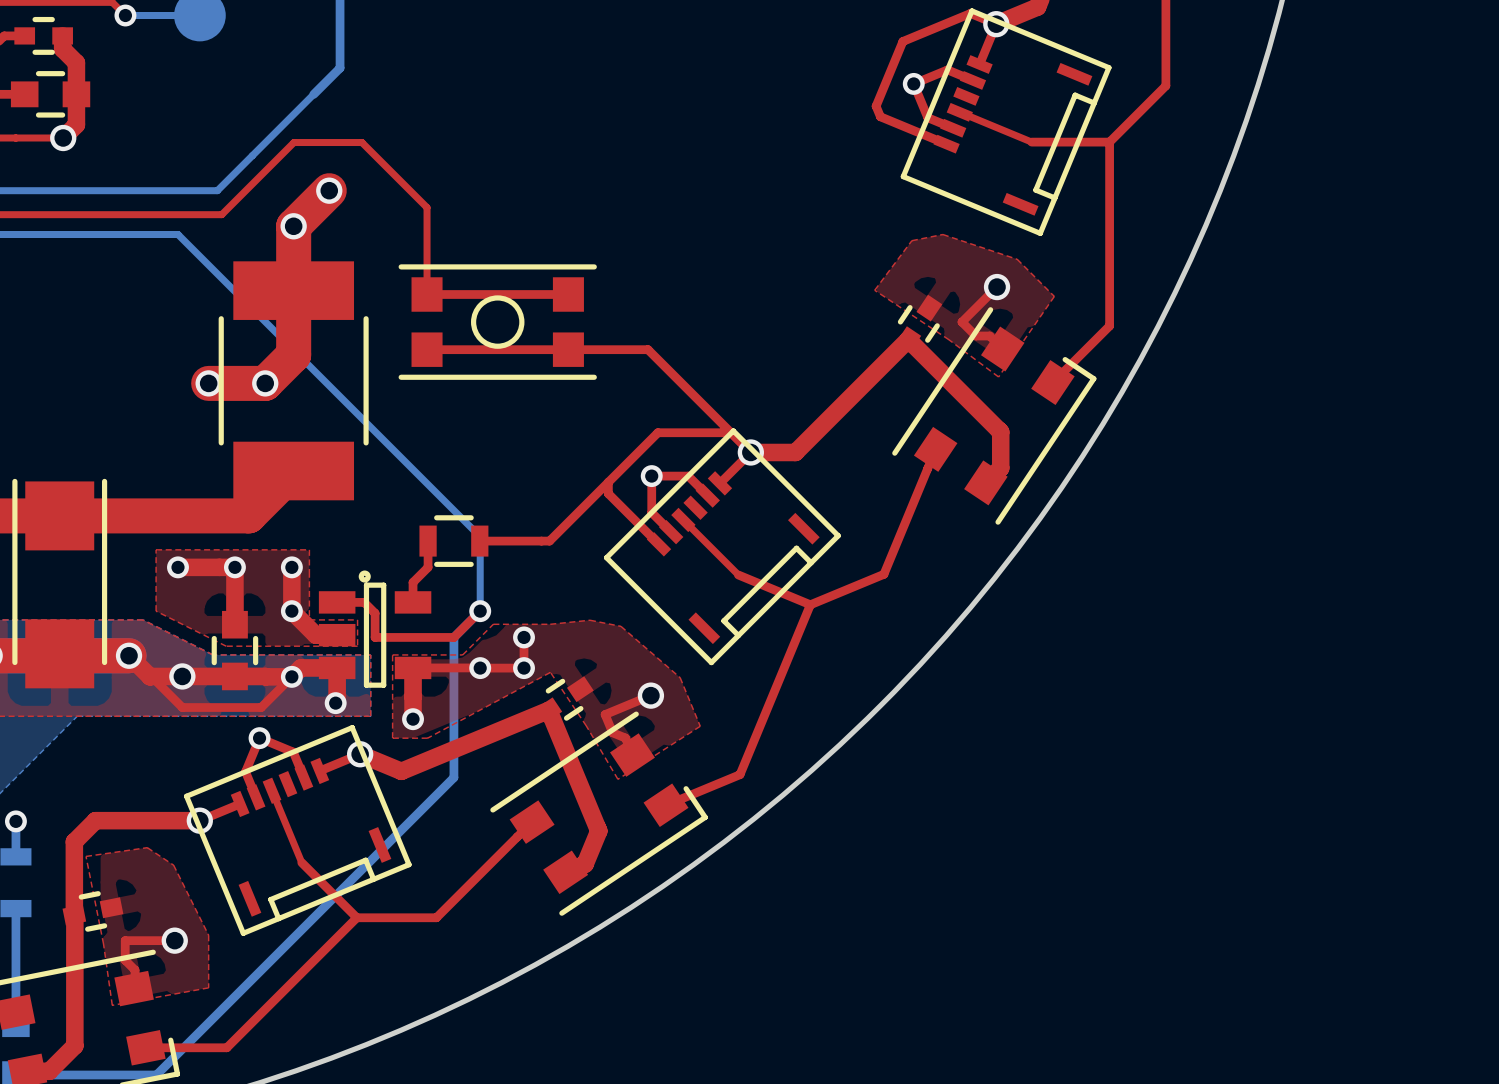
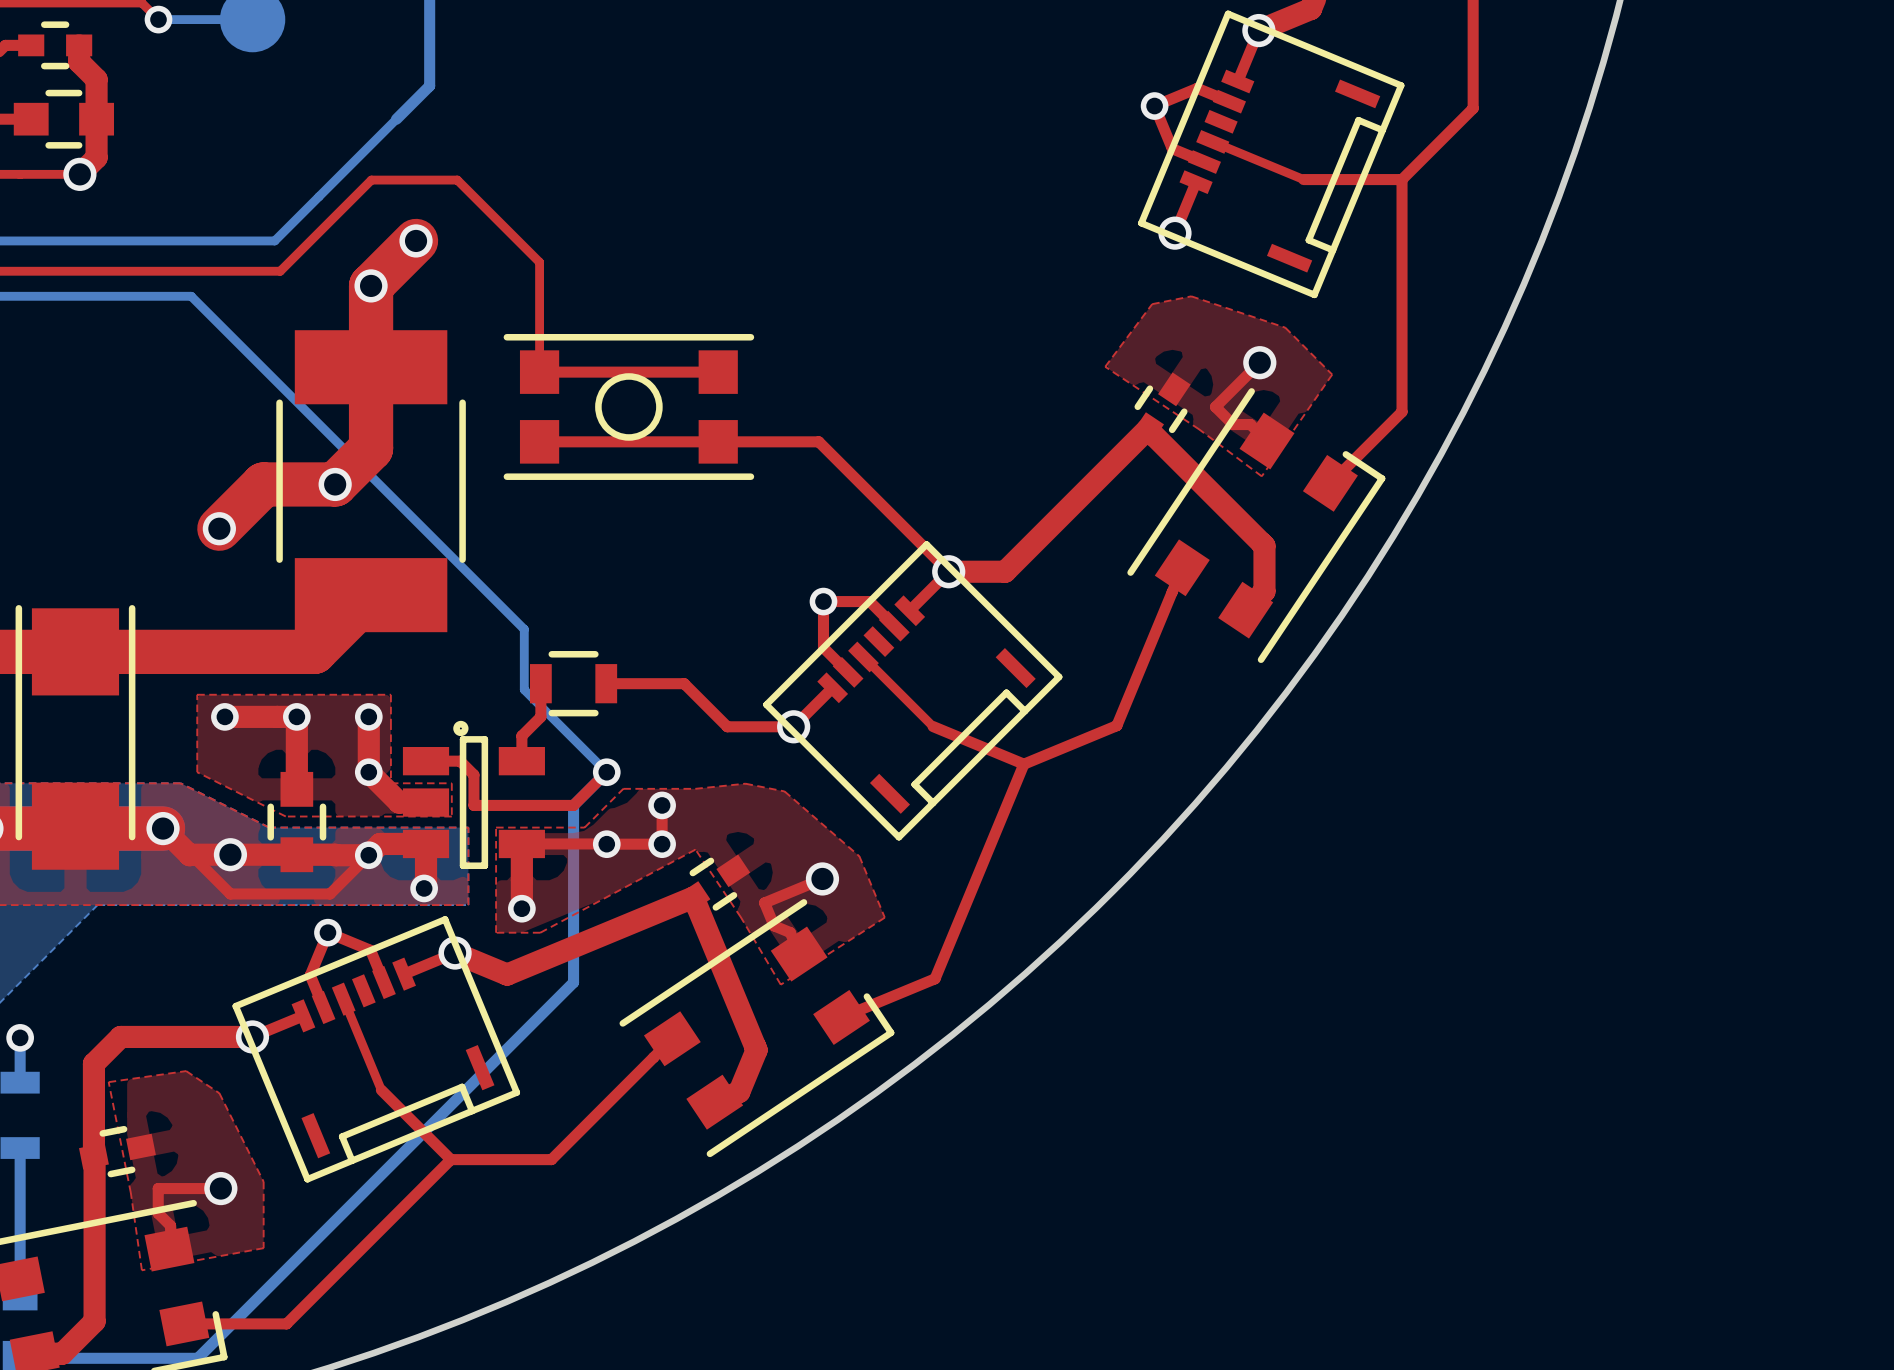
top track: (996, 24) (970, 13) (902, 41) (876, 106) (880, 116) (946, 144) -> (1174, 233) (1196, 182)
via: none -> (1174, 233)
bottom track: (151, 234) (178, 234) (480, 536) (480, 611) -> (191, 296) (524, 629) (524, 689) (606, 772)
top track: none -> (263, 484) (219, 528)
via position: (208, 383) -> (219, 528)
top track: (731, 432) (657, 432) (549, 541) (541, 541) -> none
top track: (608, 482) (608, 493) (659, 544) -> (684, 683) (727, 726) (793, 726) (832, 687)
via: none -> (793, 726)

